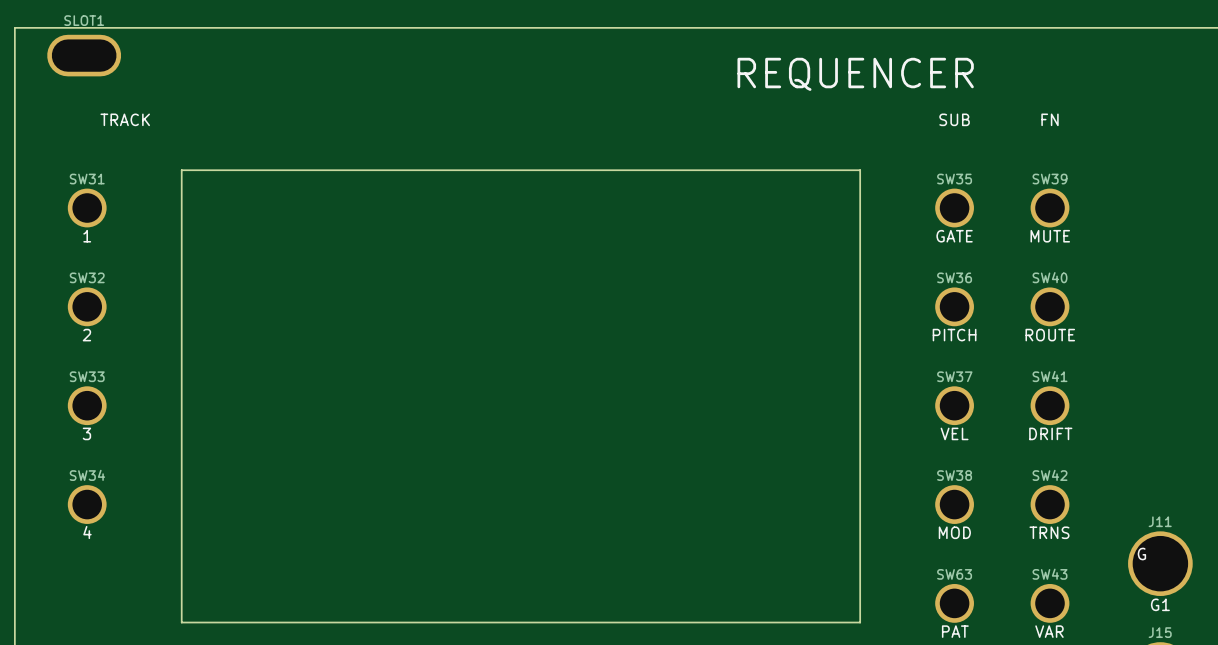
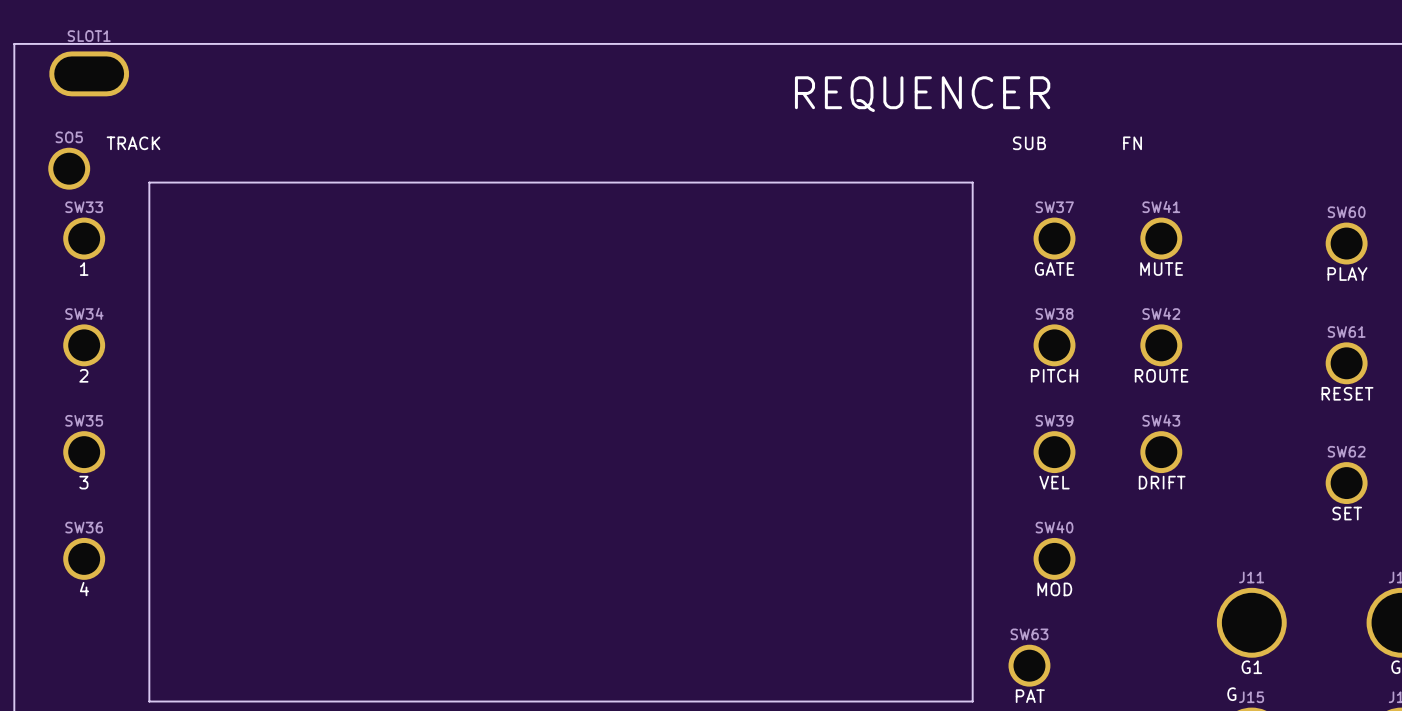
SO5: none -> (69, 168)
board edge: (181, 170) (860, 170) (860, 622) (181, 622) (181, 170) -> (149, 182) (149, 701) (972, 701) (972, 182) (149, 182)
SW31: (87, 208) -> none
SW35 position: (954, 208) -> (84, 452)
SW39 position: (1050, 208) -> (1054, 452)
SW35 text: GATE (954, 236) -> 3 (83, 482)
SW39 text: MUTE (1050, 236) -> VEL (1054, 482)
SW32: (87, 306) -> none
SW36 position: (954, 306) -> (84, 558)
SW40 position: (1050, 306) -> (1054, 558)
SW36 text: PITCH (954, 335) -> 4 (84, 589)
SW40 text: ROUTE (1050, 335) -> MOD (1054, 589)
SW33 position: (87, 405) -> (84, 238)
SW37 position: (954, 405) -> (1054, 238)
SW41 position: (1050, 405) -> (1161, 238)
SW33 text: 3 (86, 433) -> 1 (84, 269)
SW37 text: VEL (954, 433) -> GATE (1054, 269)
SW41 text: DRIFT (1050, 433) -> MUTE (1161, 269)
SW34 position: (87, 504) -> (84, 345)
SW38 position: (954, 504) -> (1054, 345)
SW42 position: (1050, 504) -> (1161, 345)
SW34 text: 4 (87, 532) -> 2 (83, 375)
SW38 text: MOD (954, 532) -> PITCH (1054, 375)
SW42 text: TRNS (1049, 532) -> ROUTE (1161, 375)
text position: G (1141, 554) -> G (1231, 694)
SW43 position: (1050, 603) -> (1161, 452)
SW43 text: VAR (1049, 631) -> DRIFT (1162, 482)

